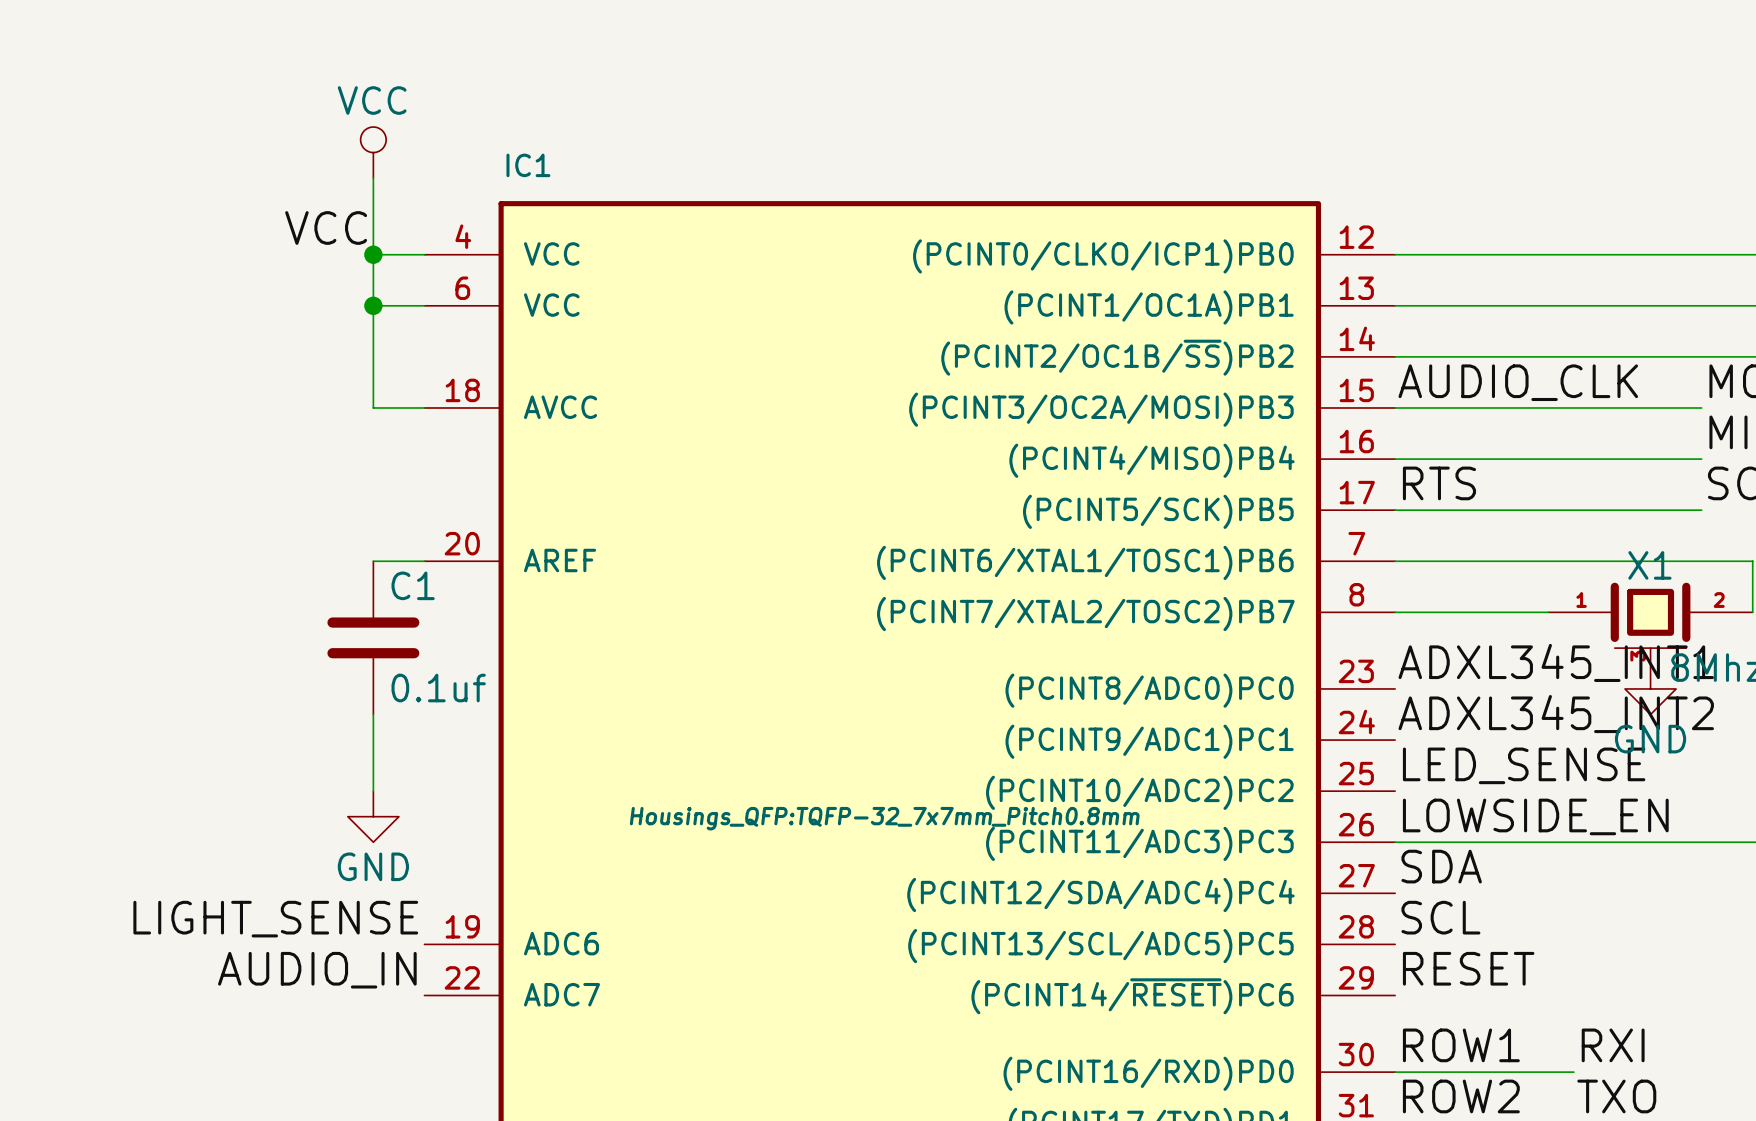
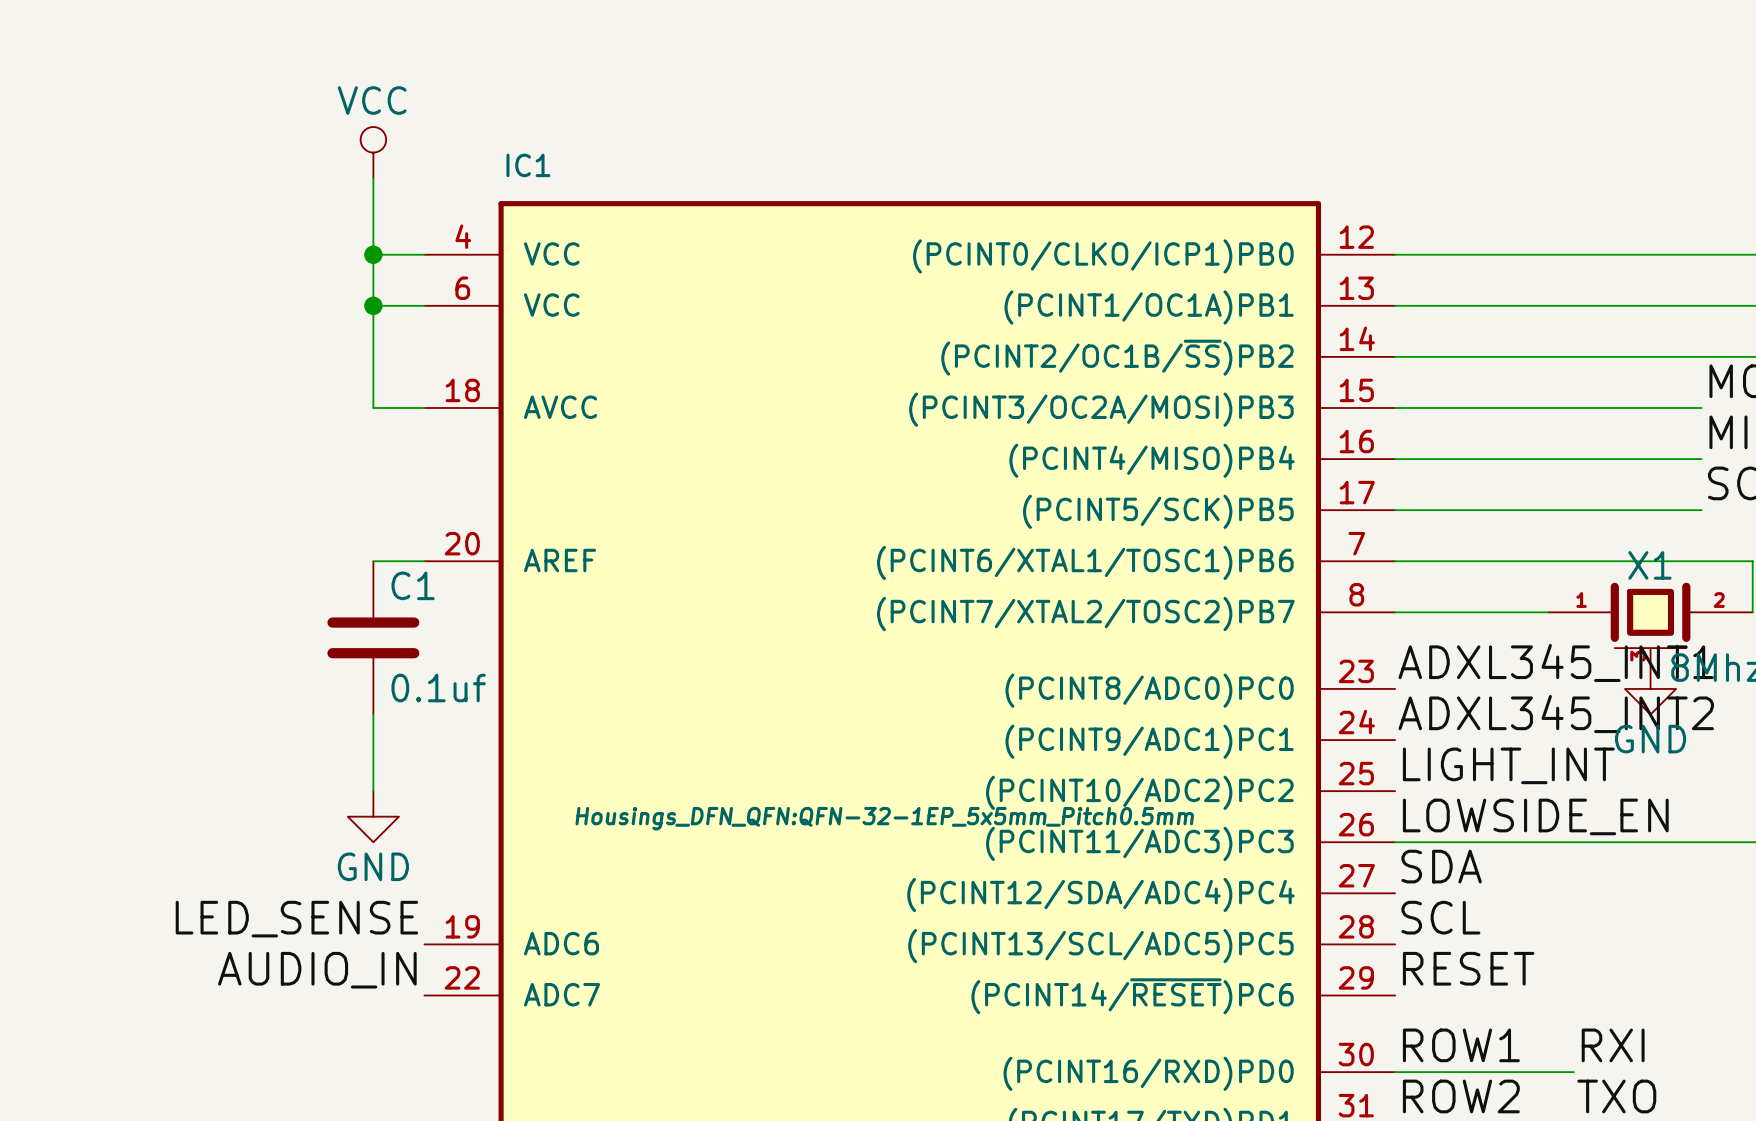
label: VCC (326, 227) -> none
label: AUDIO_CLK (1518, 382) -> none
label: RTS (1439, 483) -> none
label: LED_SENSE (1524, 765) -> LIGHT_INT (1508, 765)
IC1 text: Housings_QFP:TQFP-32_7x7mm_Pitch0.8mm (884, 818) -> Housings_DFN_QFN:QFN-32-1EP_5x5mm_Pitch0.5mm (884, 818)
label: LIGHT_SENSE (275, 919) -> LED_SENSE (296, 919)

